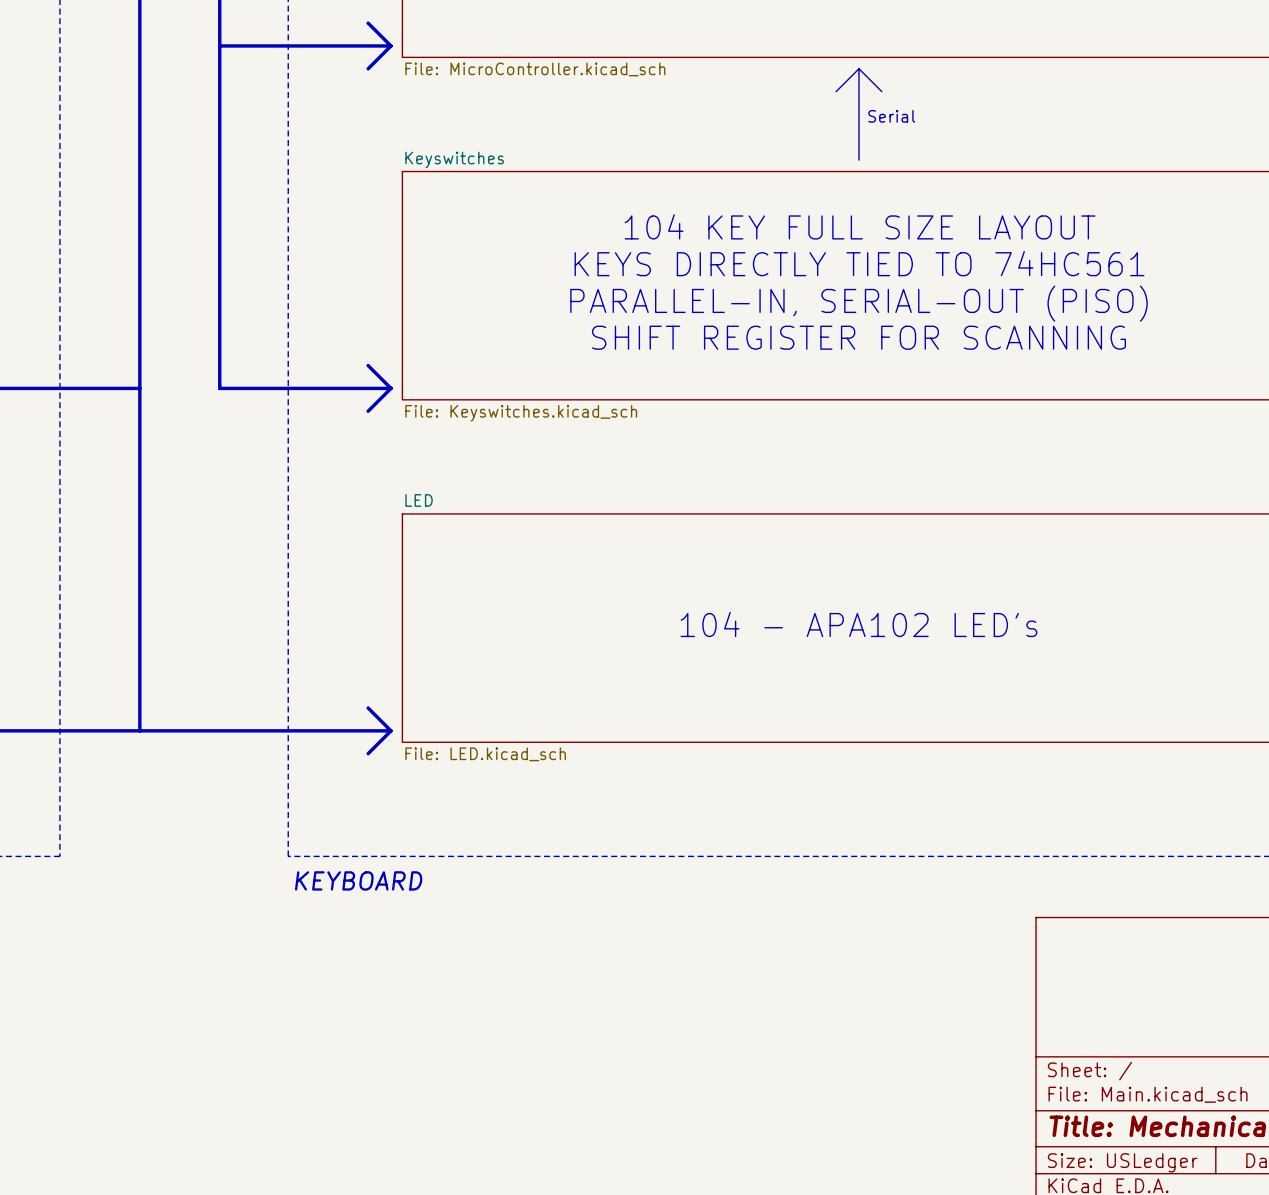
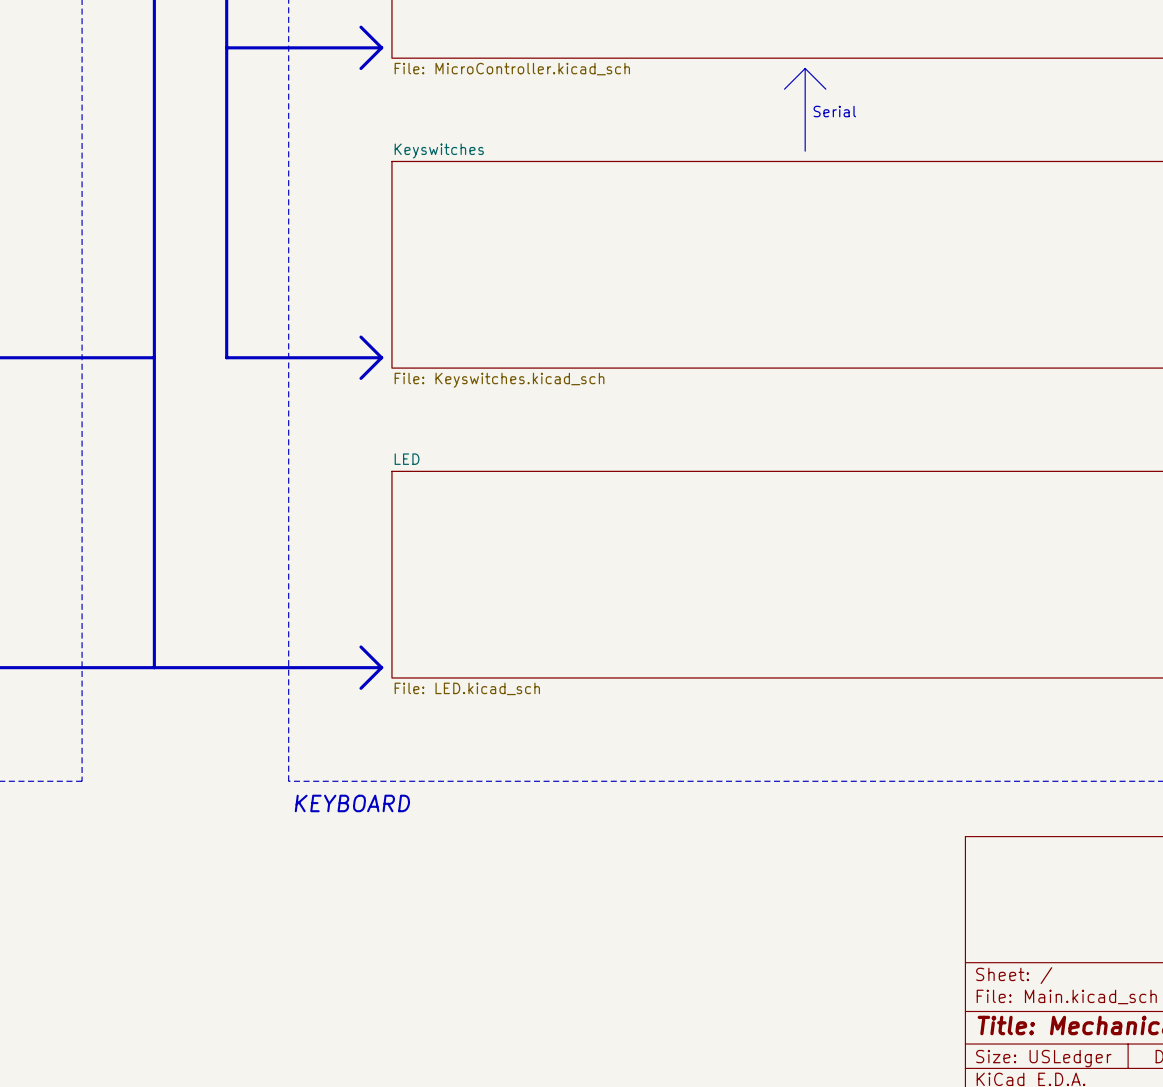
text: 104 KEY FULL SIZE LAYOUT (860, 226) -> none
text: KEYS DIRECTLY TIED TO 74HC561 (859, 263) -> none
text: PARALLEL-IN, SERIAL-OUT (PISO) (858, 303) -> none
text: SHIFT REGISTER FOR SCANNING (858, 337) -> none
text: 104 - APA102 LED's (858, 624) -> none

